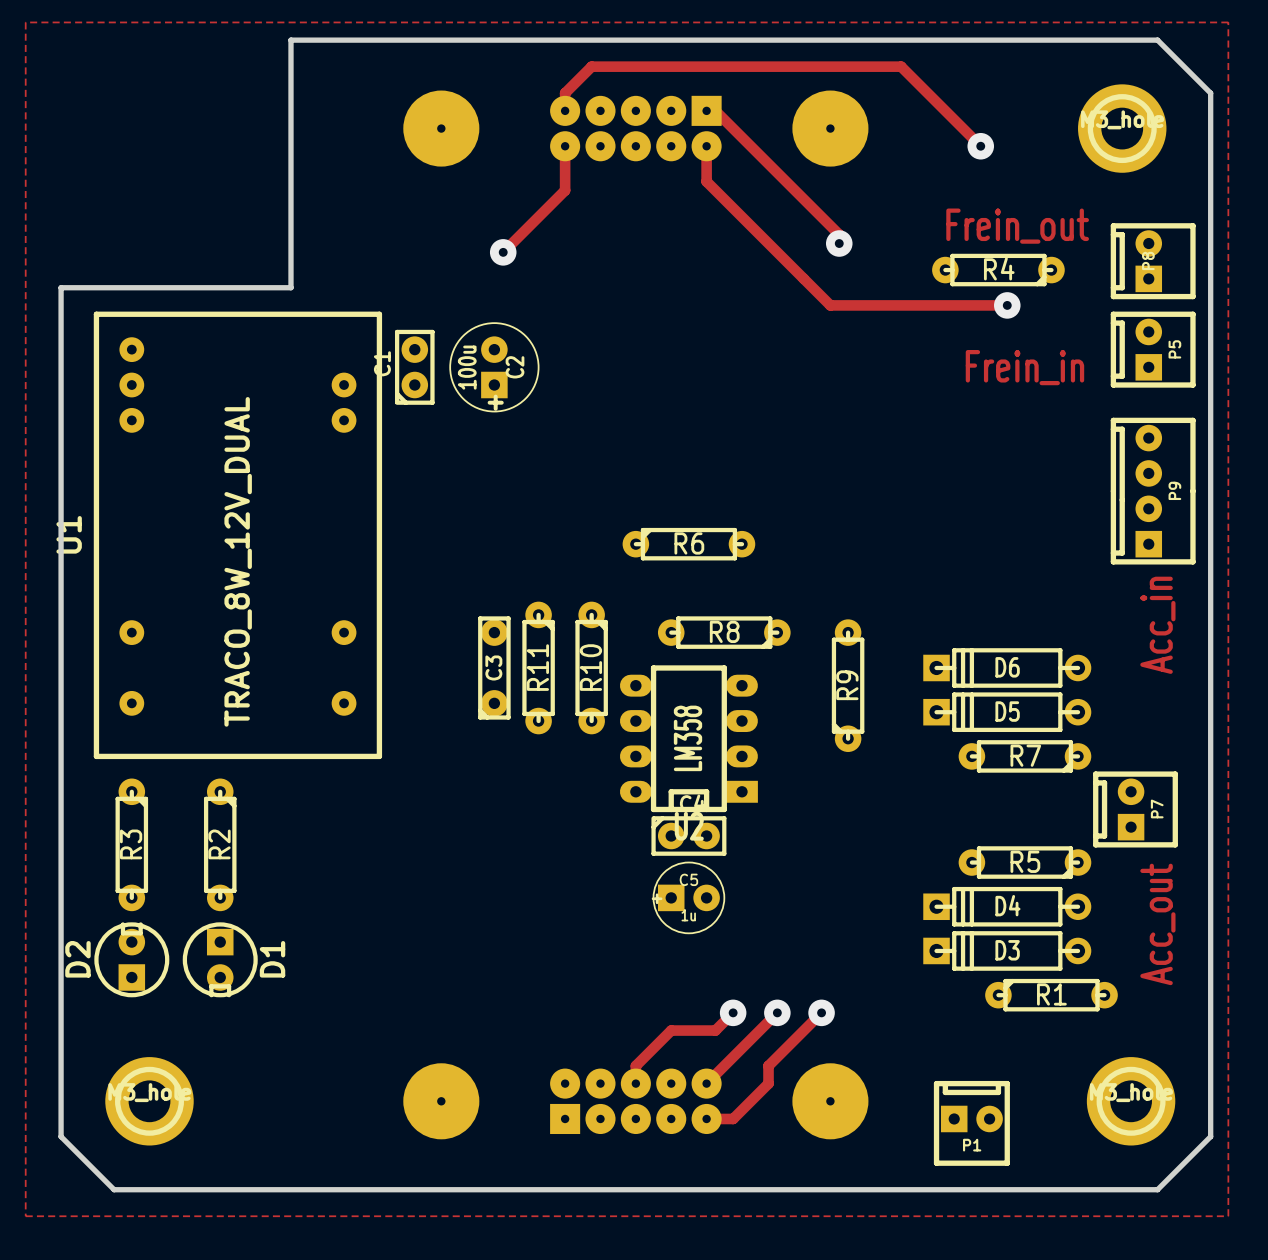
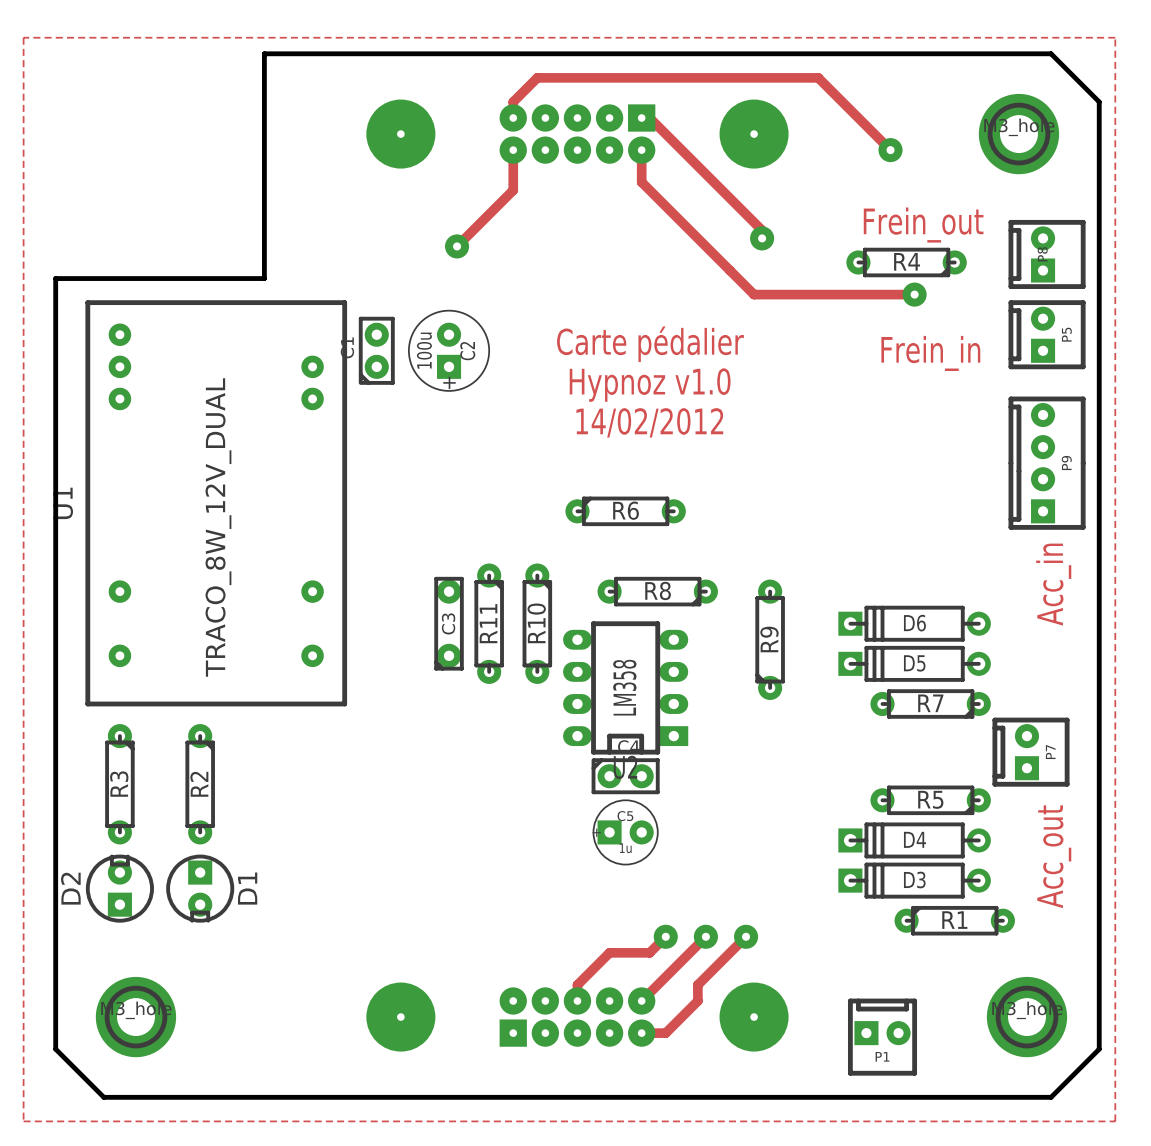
text: none -> Carte pédalier (650, 344)
text: none -> Hypnoz v1.0 (650, 385)
text: none -> 14/02/2012 (649, 422)

